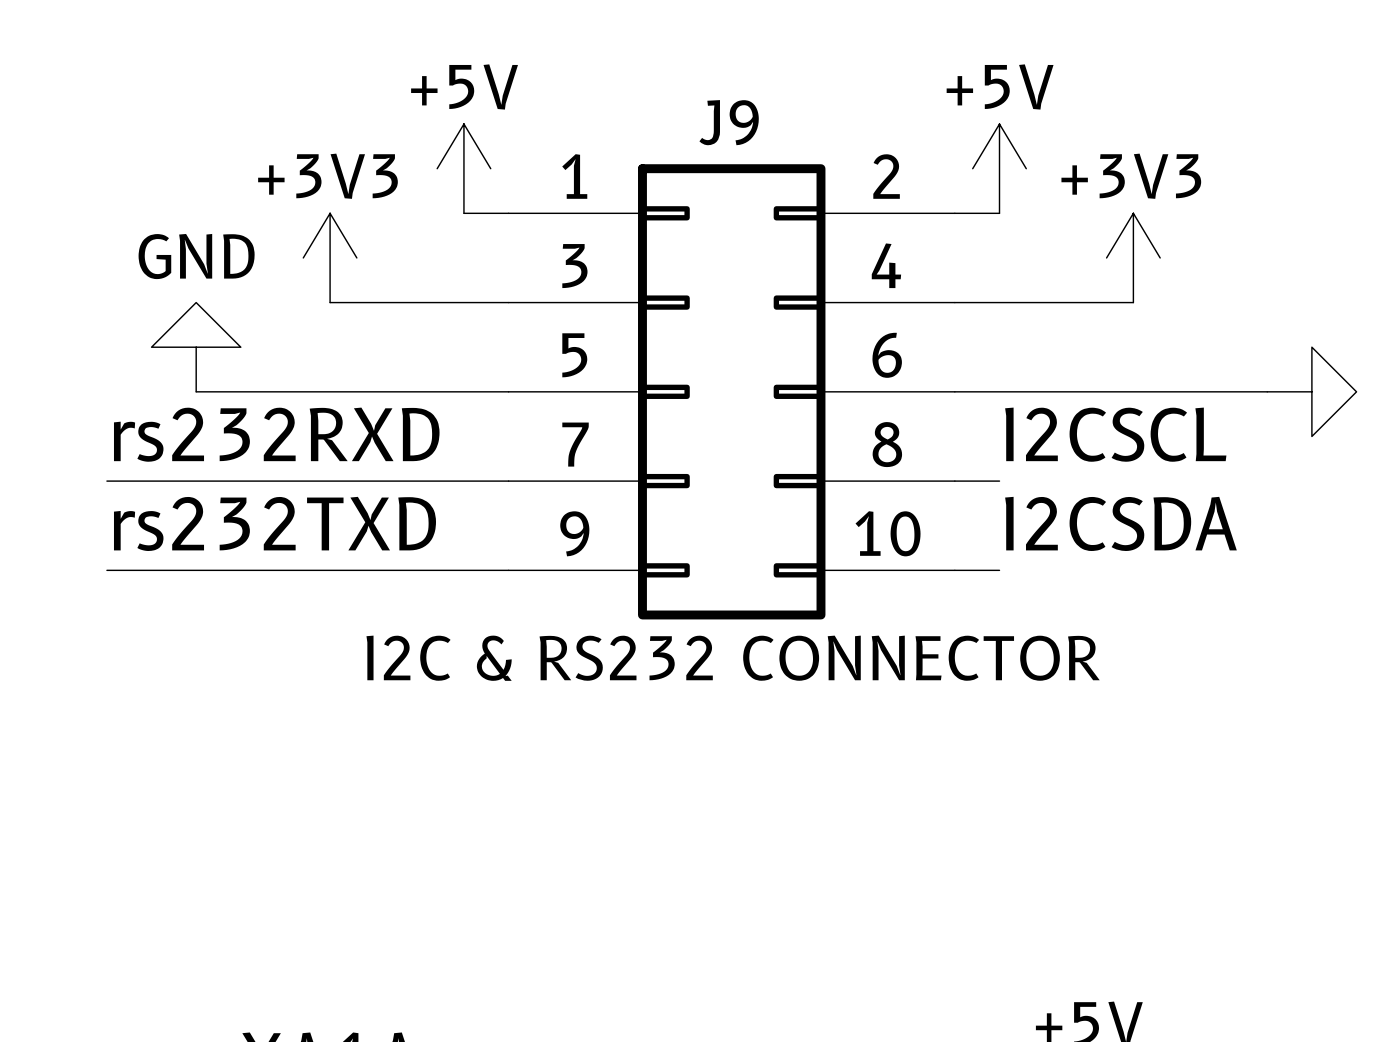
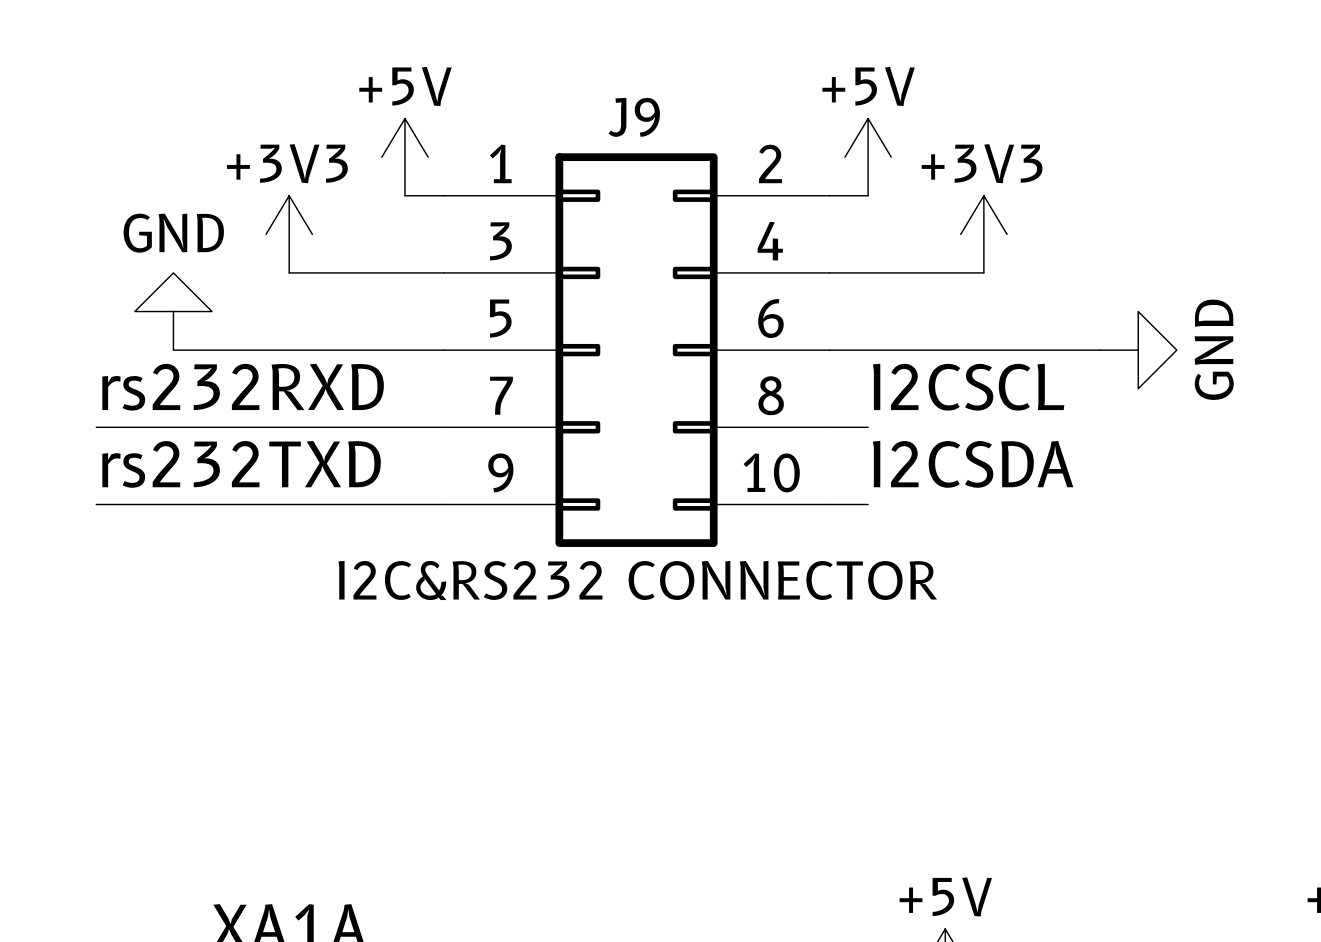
J9 value: I2C & RS232 CONNECTOR (733, 658) -> I2C&RS232 CONNECTOR (637, 580)

